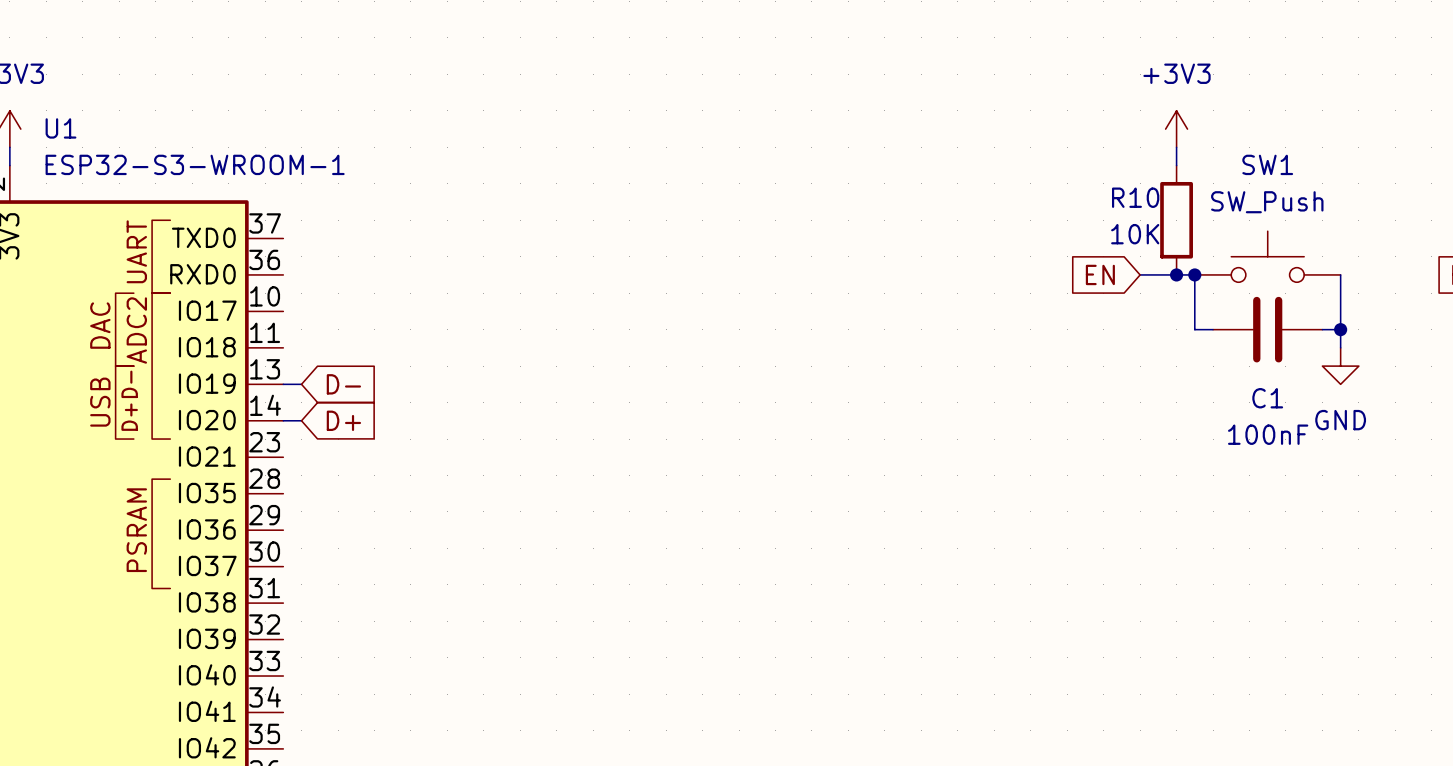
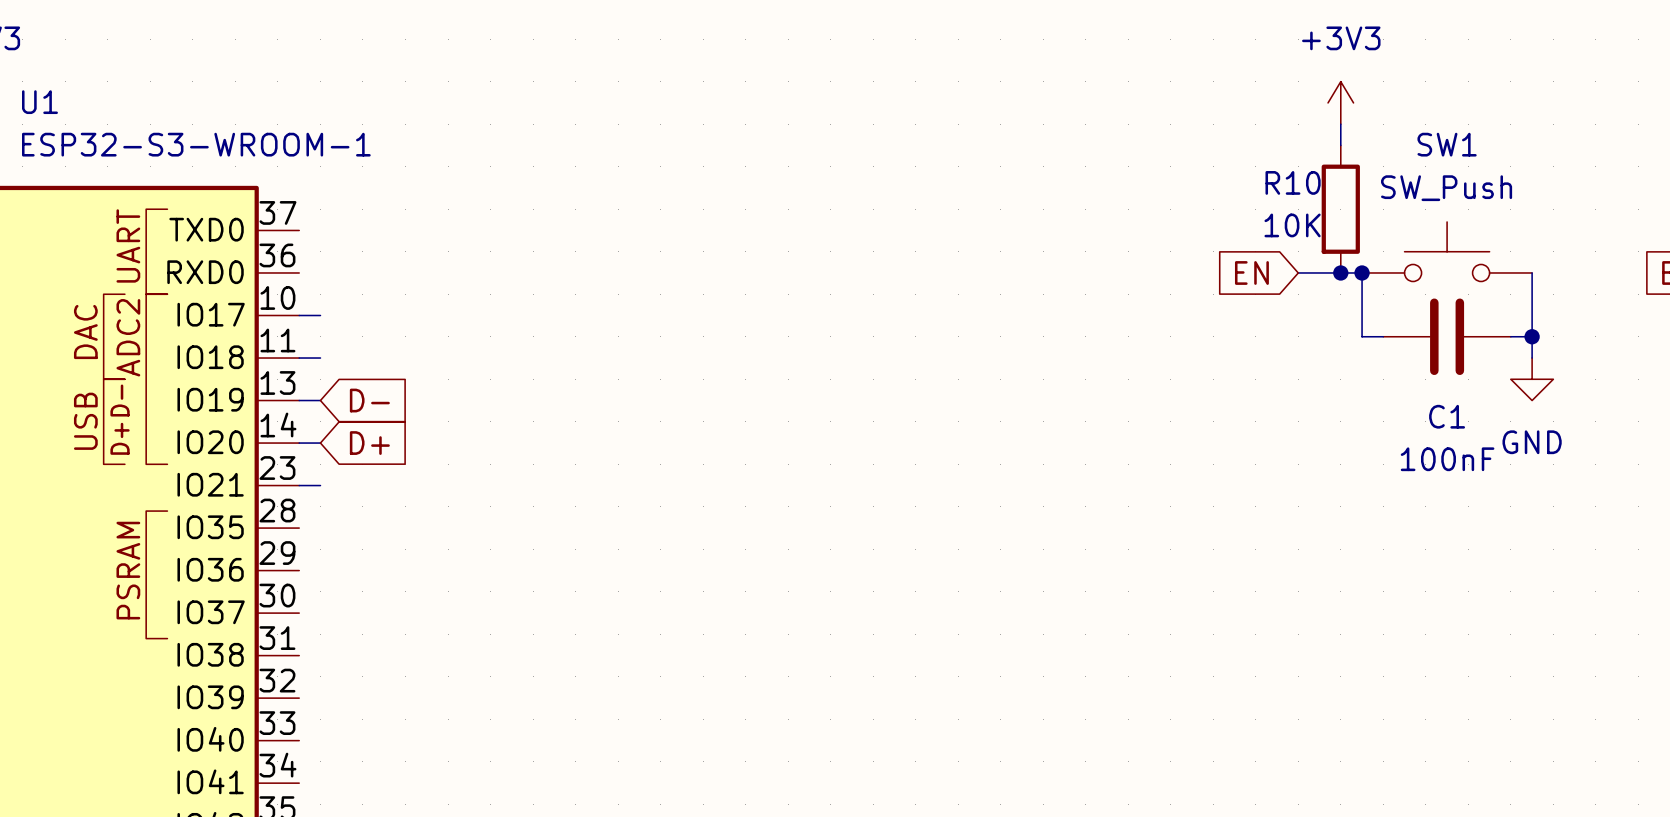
wire: none -> (299, 315) (320, 315)
wire: none -> (299, 358) (320, 358)
wire: none -> (299, 485) (320, 485)

